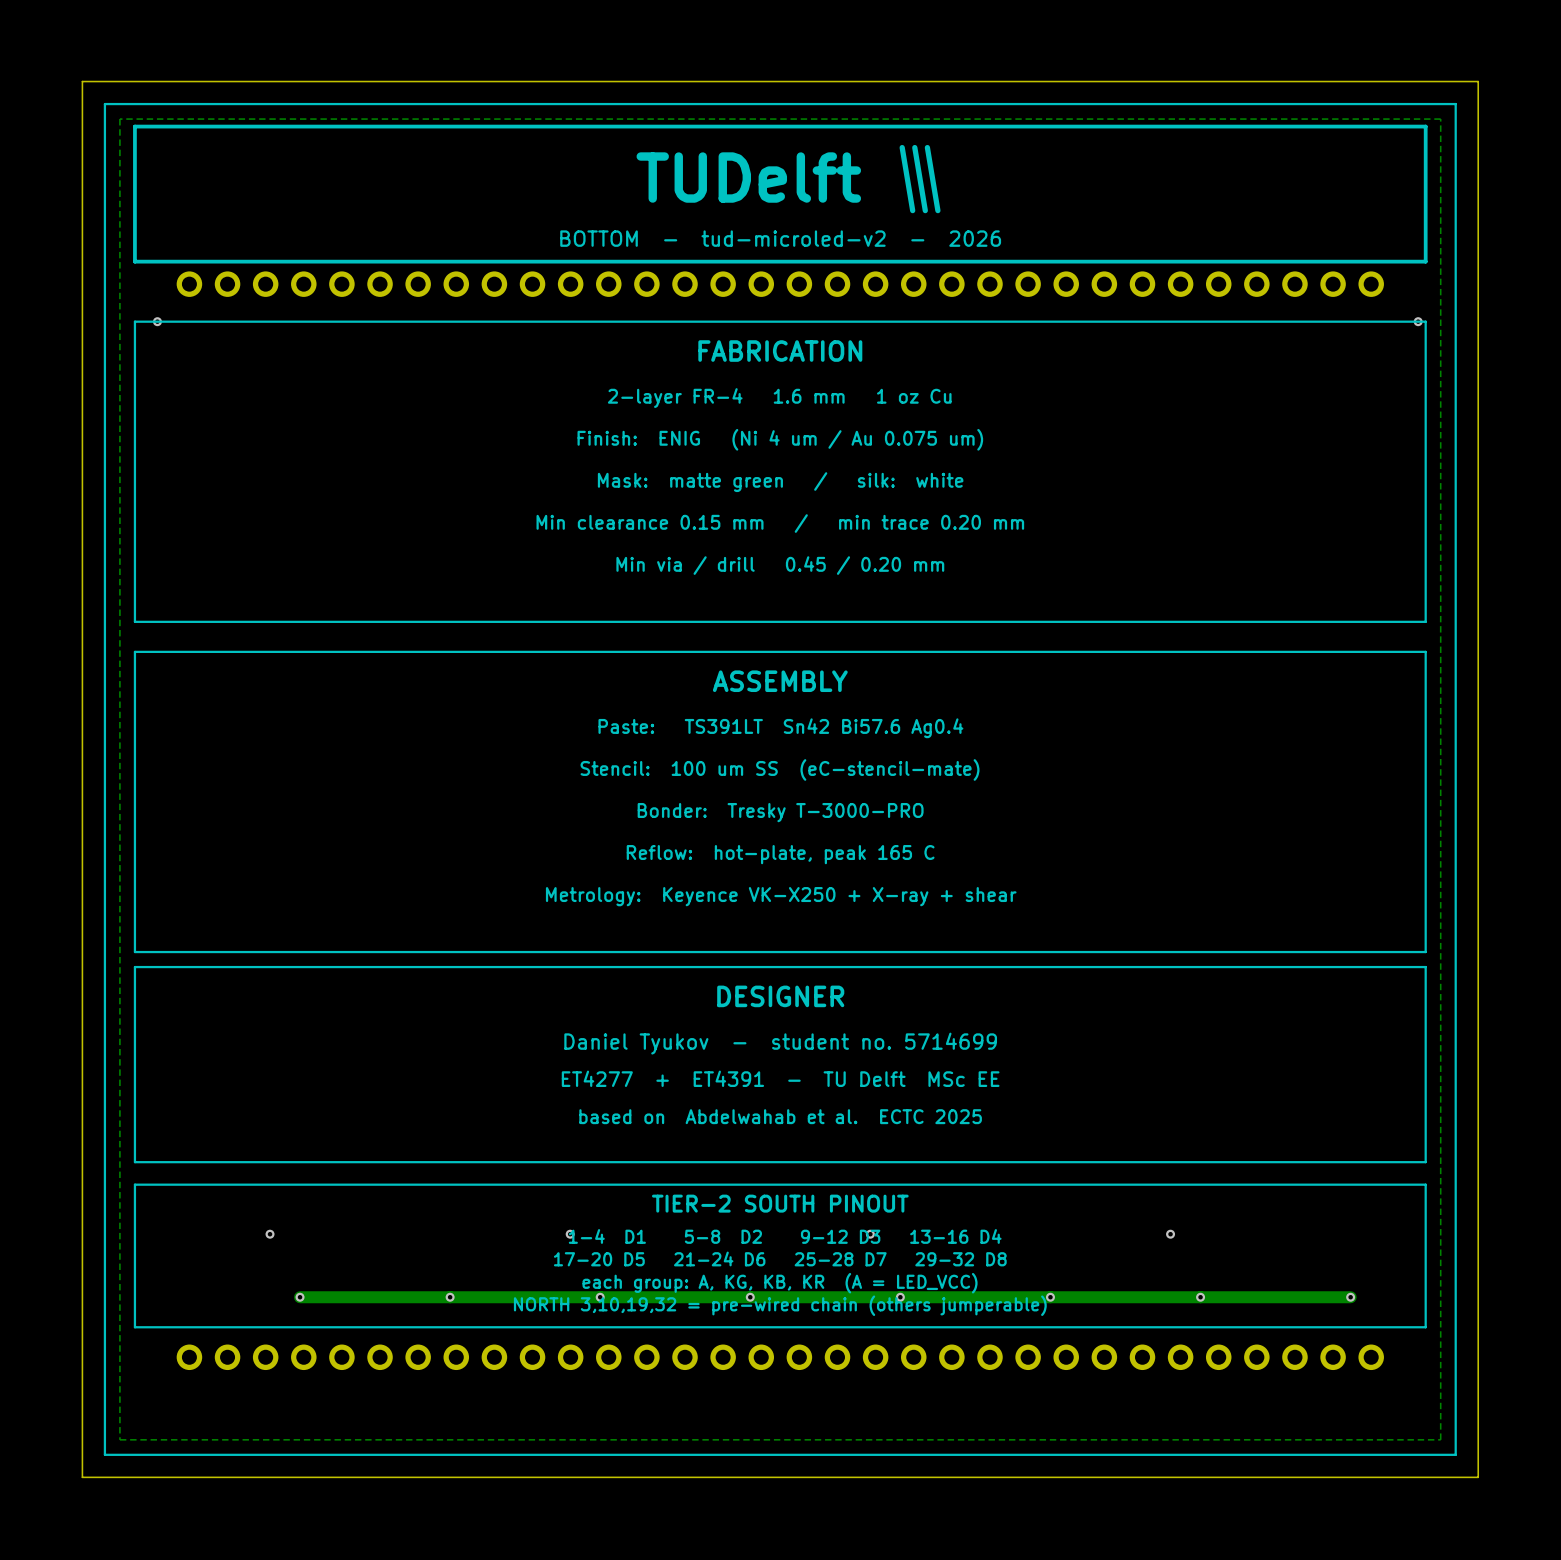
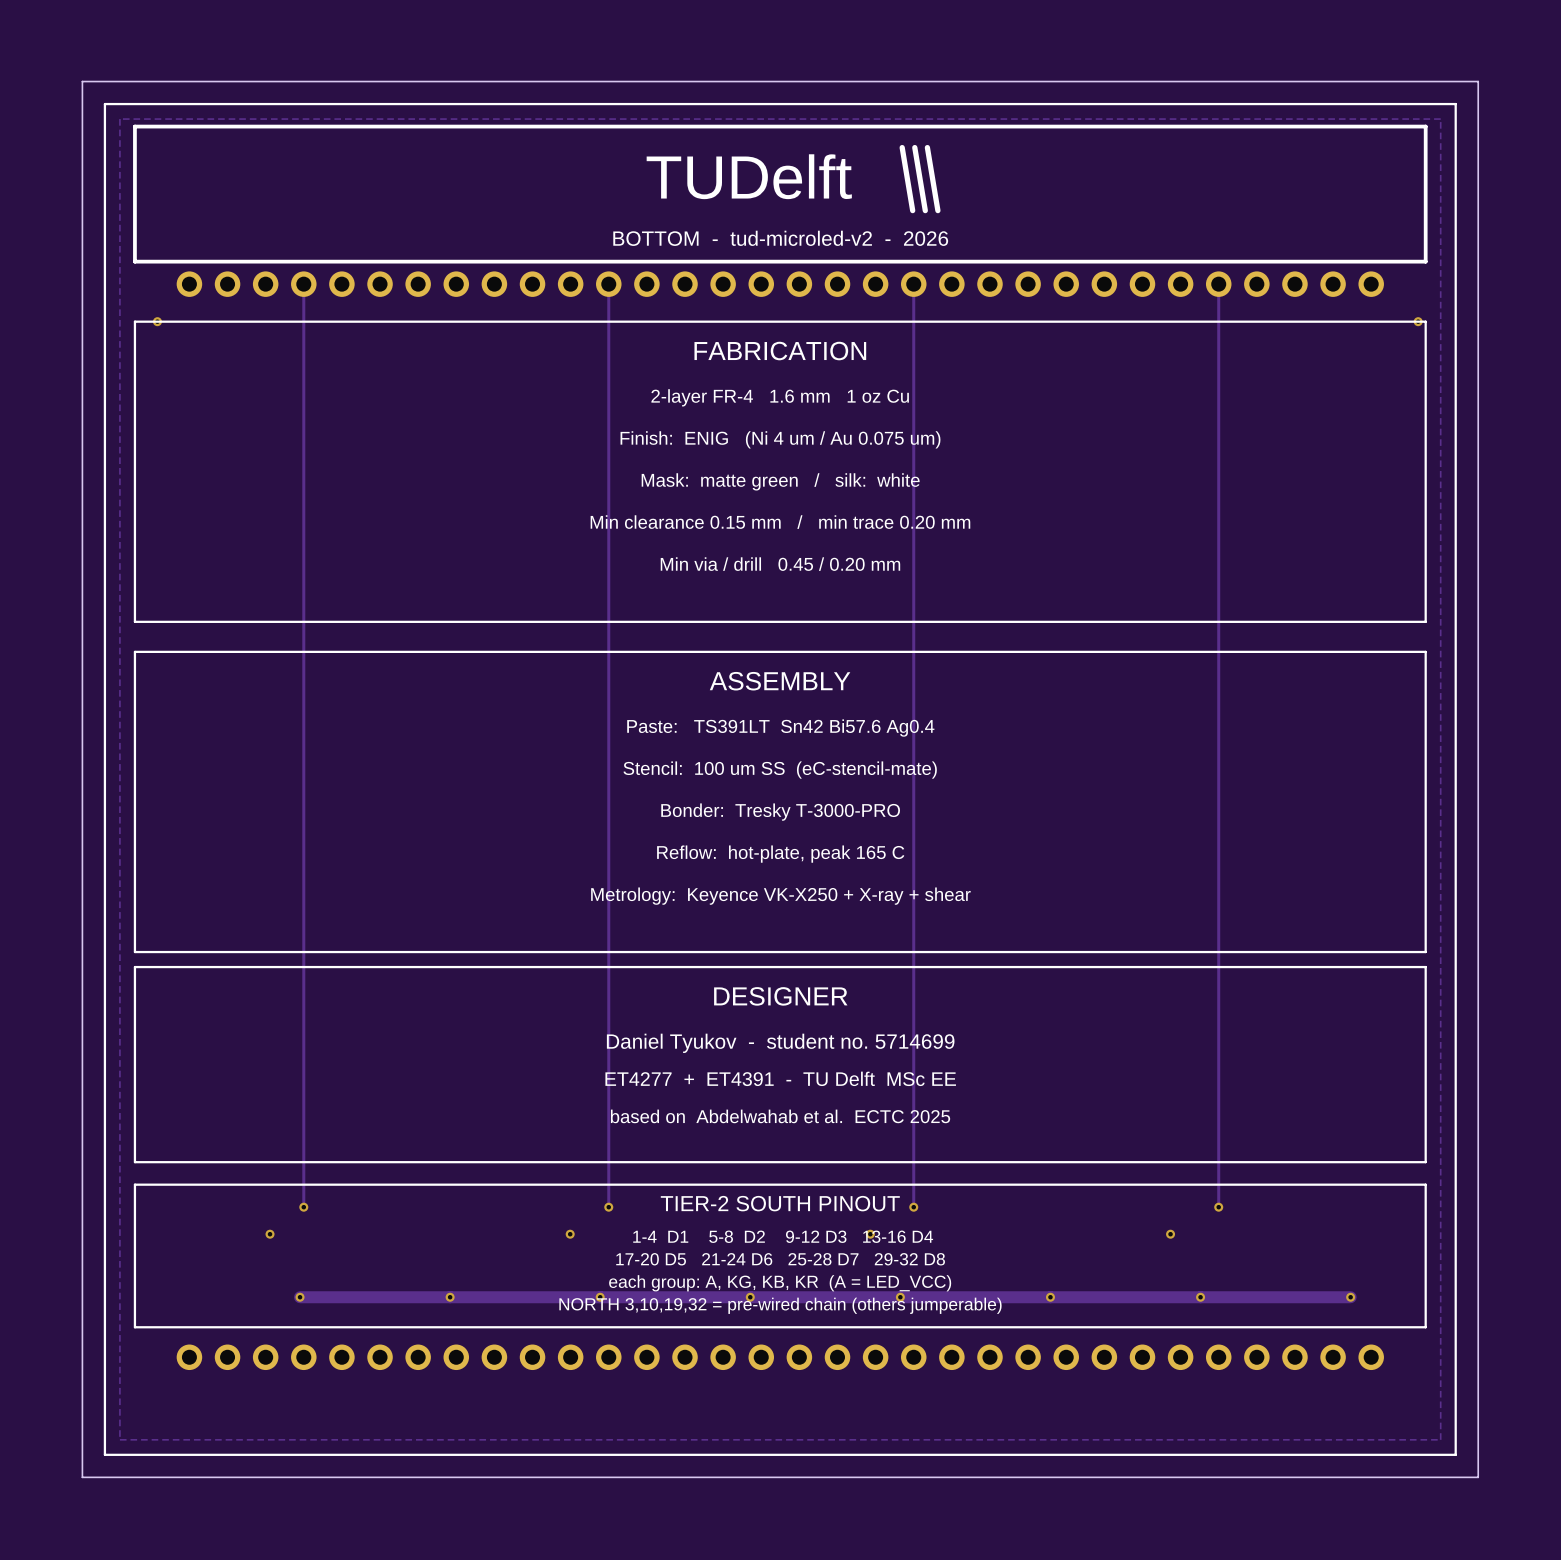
track: none -> (303, 284) (303, 1207)
track: none -> (608, 284) (608, 1207)
track: none -> (913, 284) (913, 1207)
track: none -> (1218, 284) (1218, 1207)
via: none -> (303, 1207)
via: none -> (608, 1207)
via: none -> (913, 1207)
via: none -> (1218, 1207)

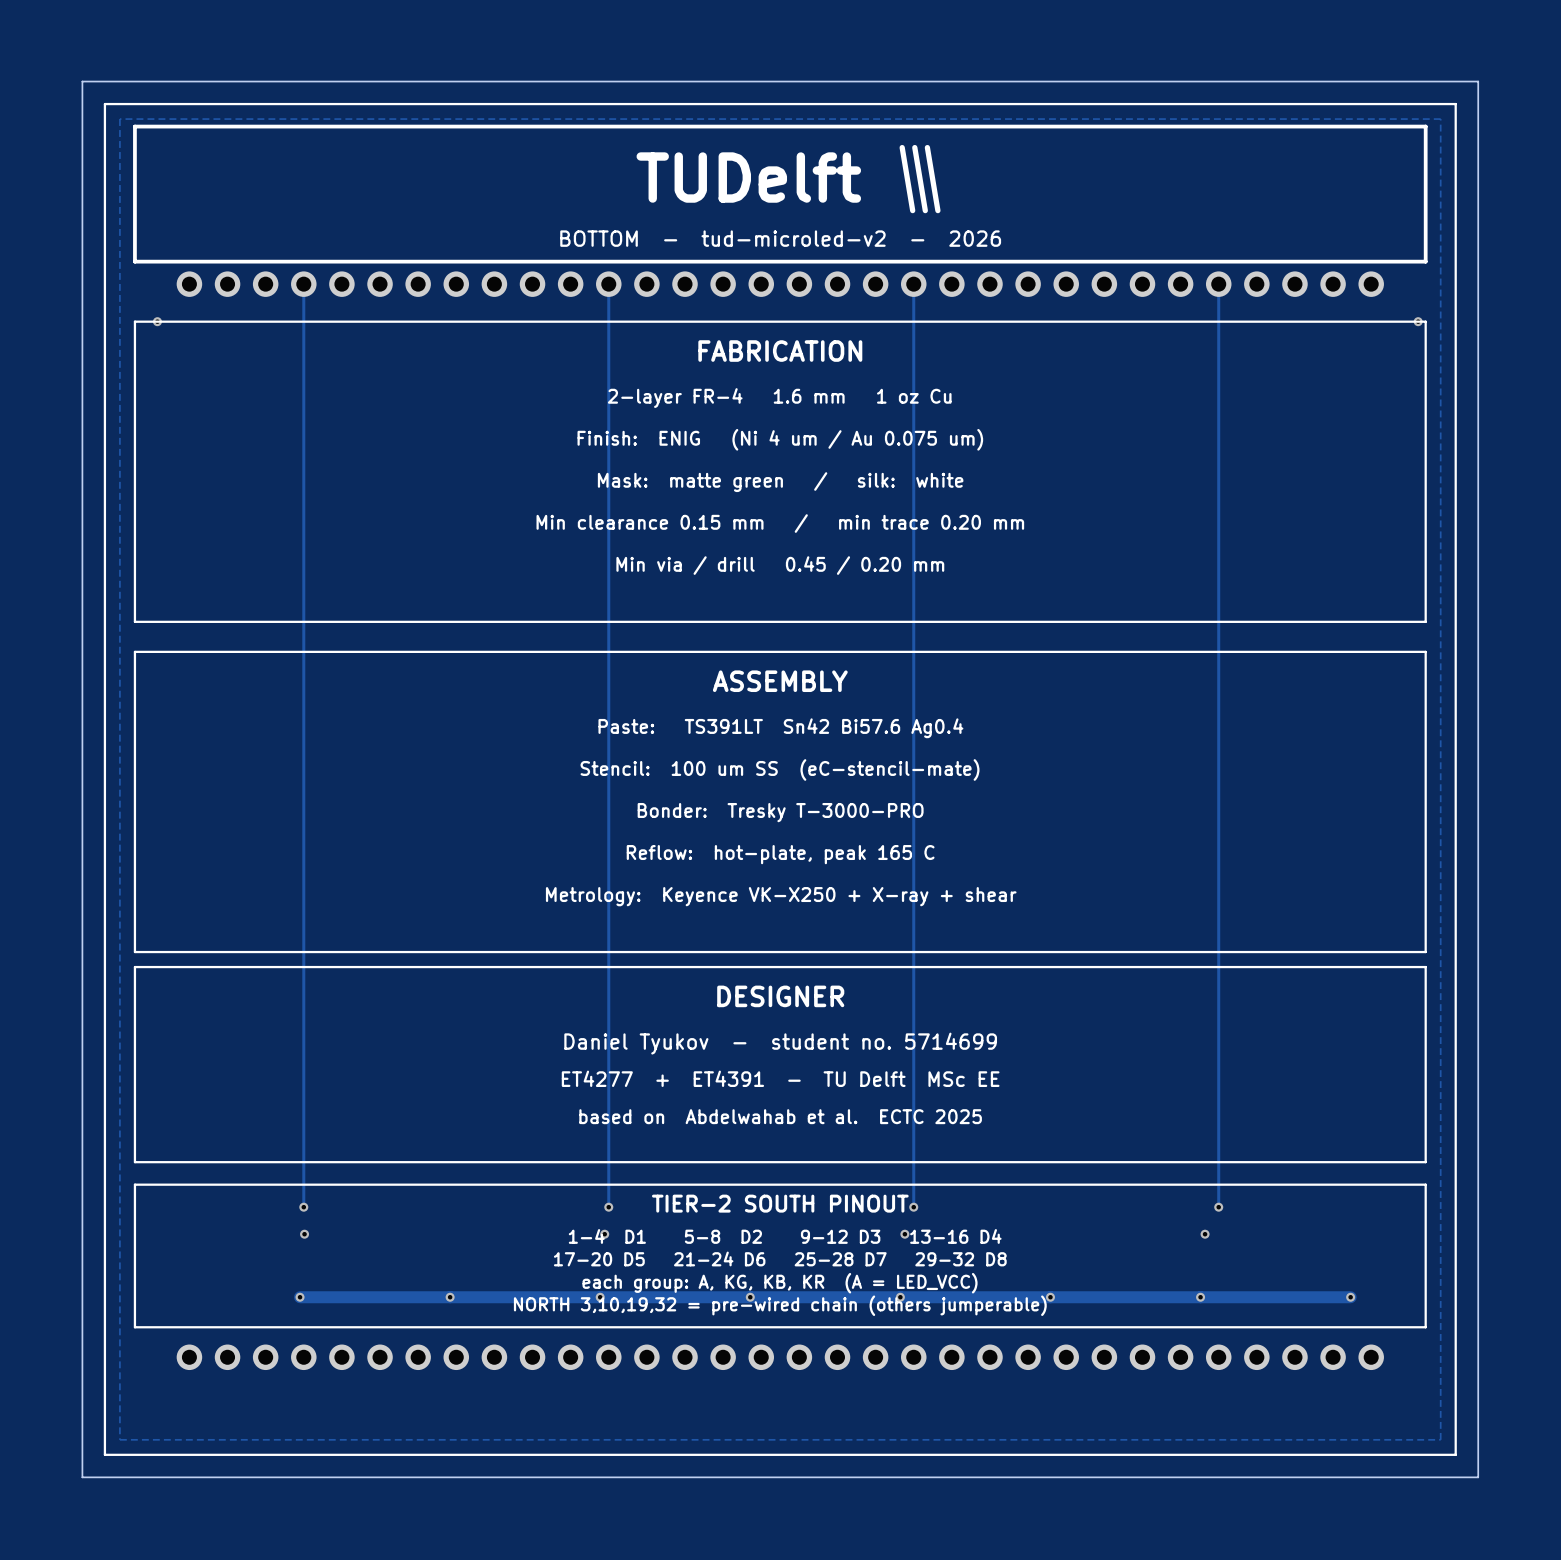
via position: (270, 1234) -> (304, 1234)
via position: (570, 1234) -> (604, 1234)
via position: (870, 1234) -> (904, 1234)
via position: (1170, 1234) -> (1205, 1234)

